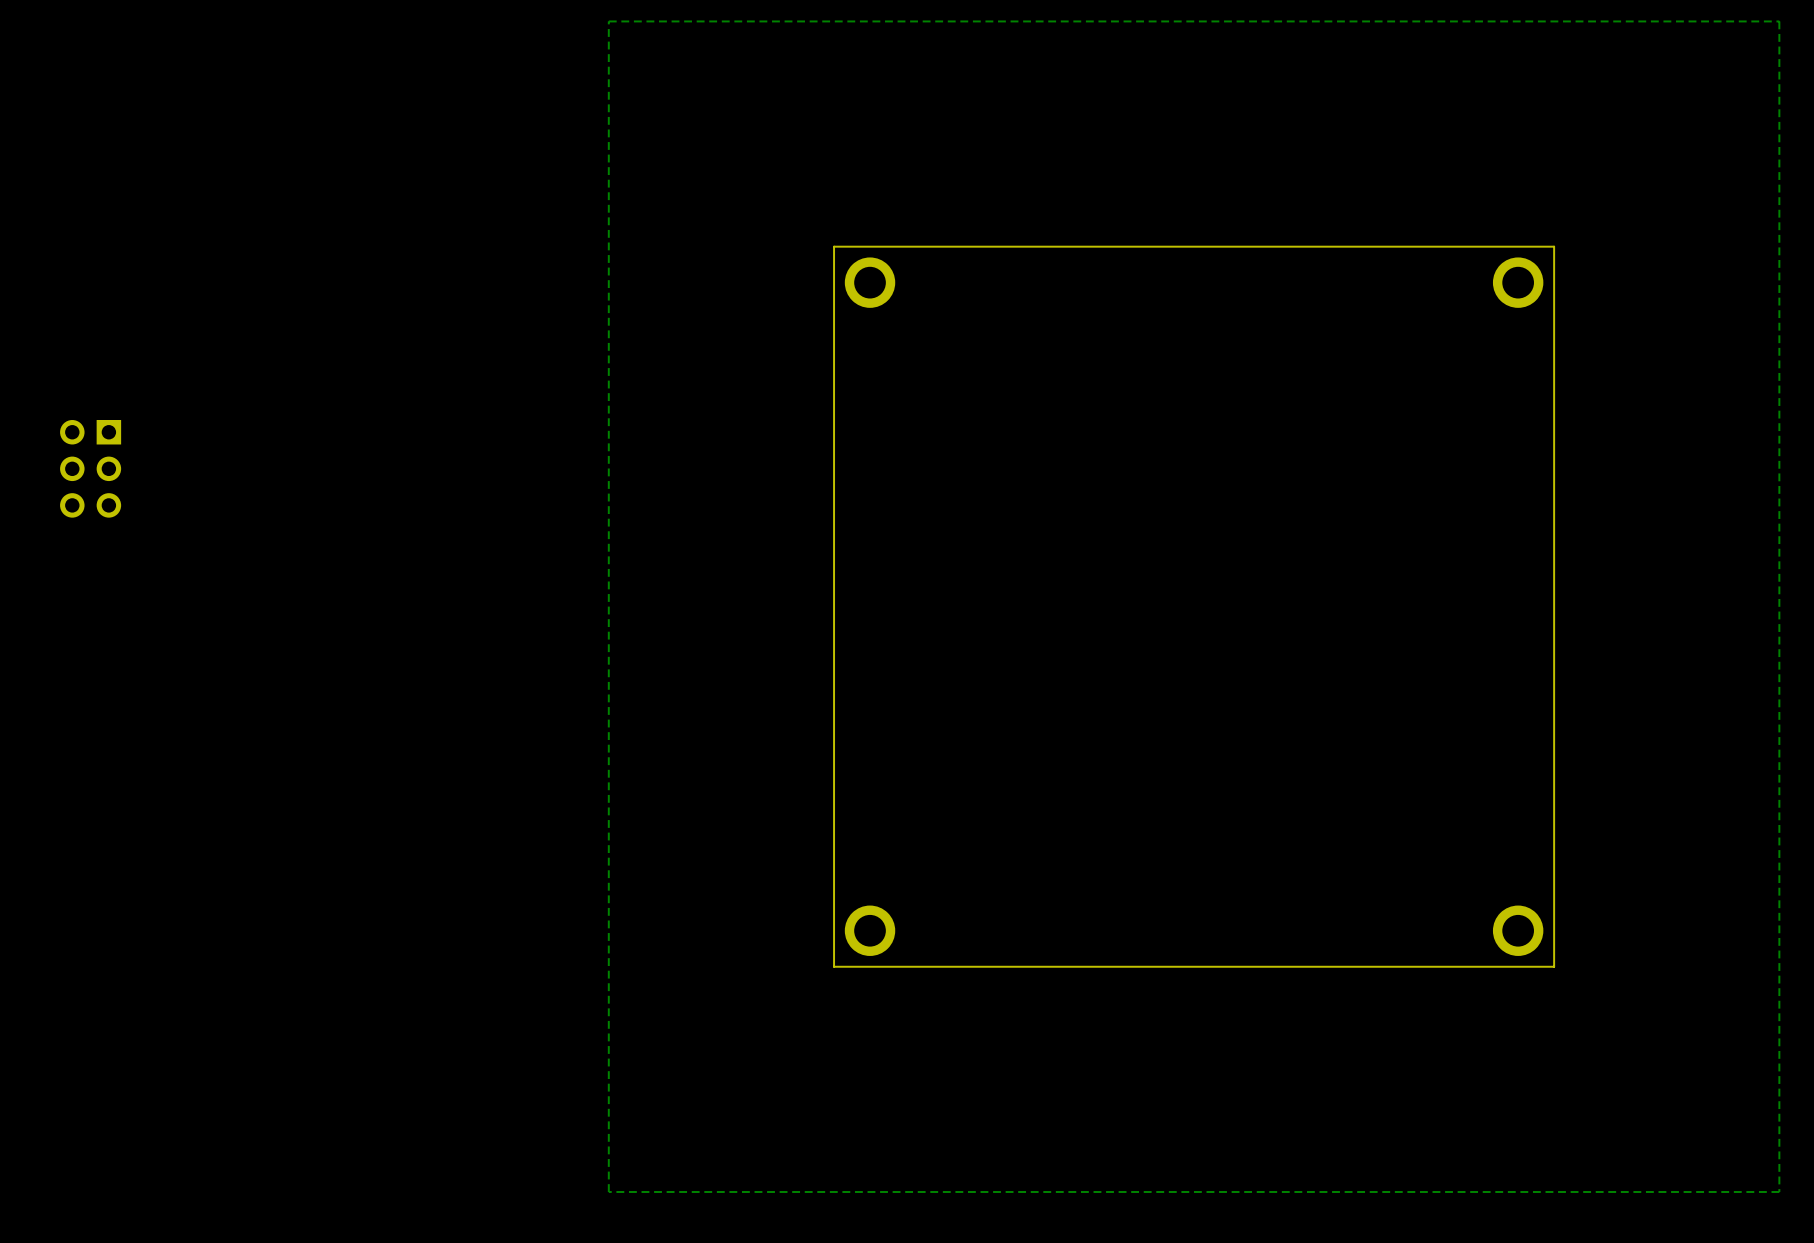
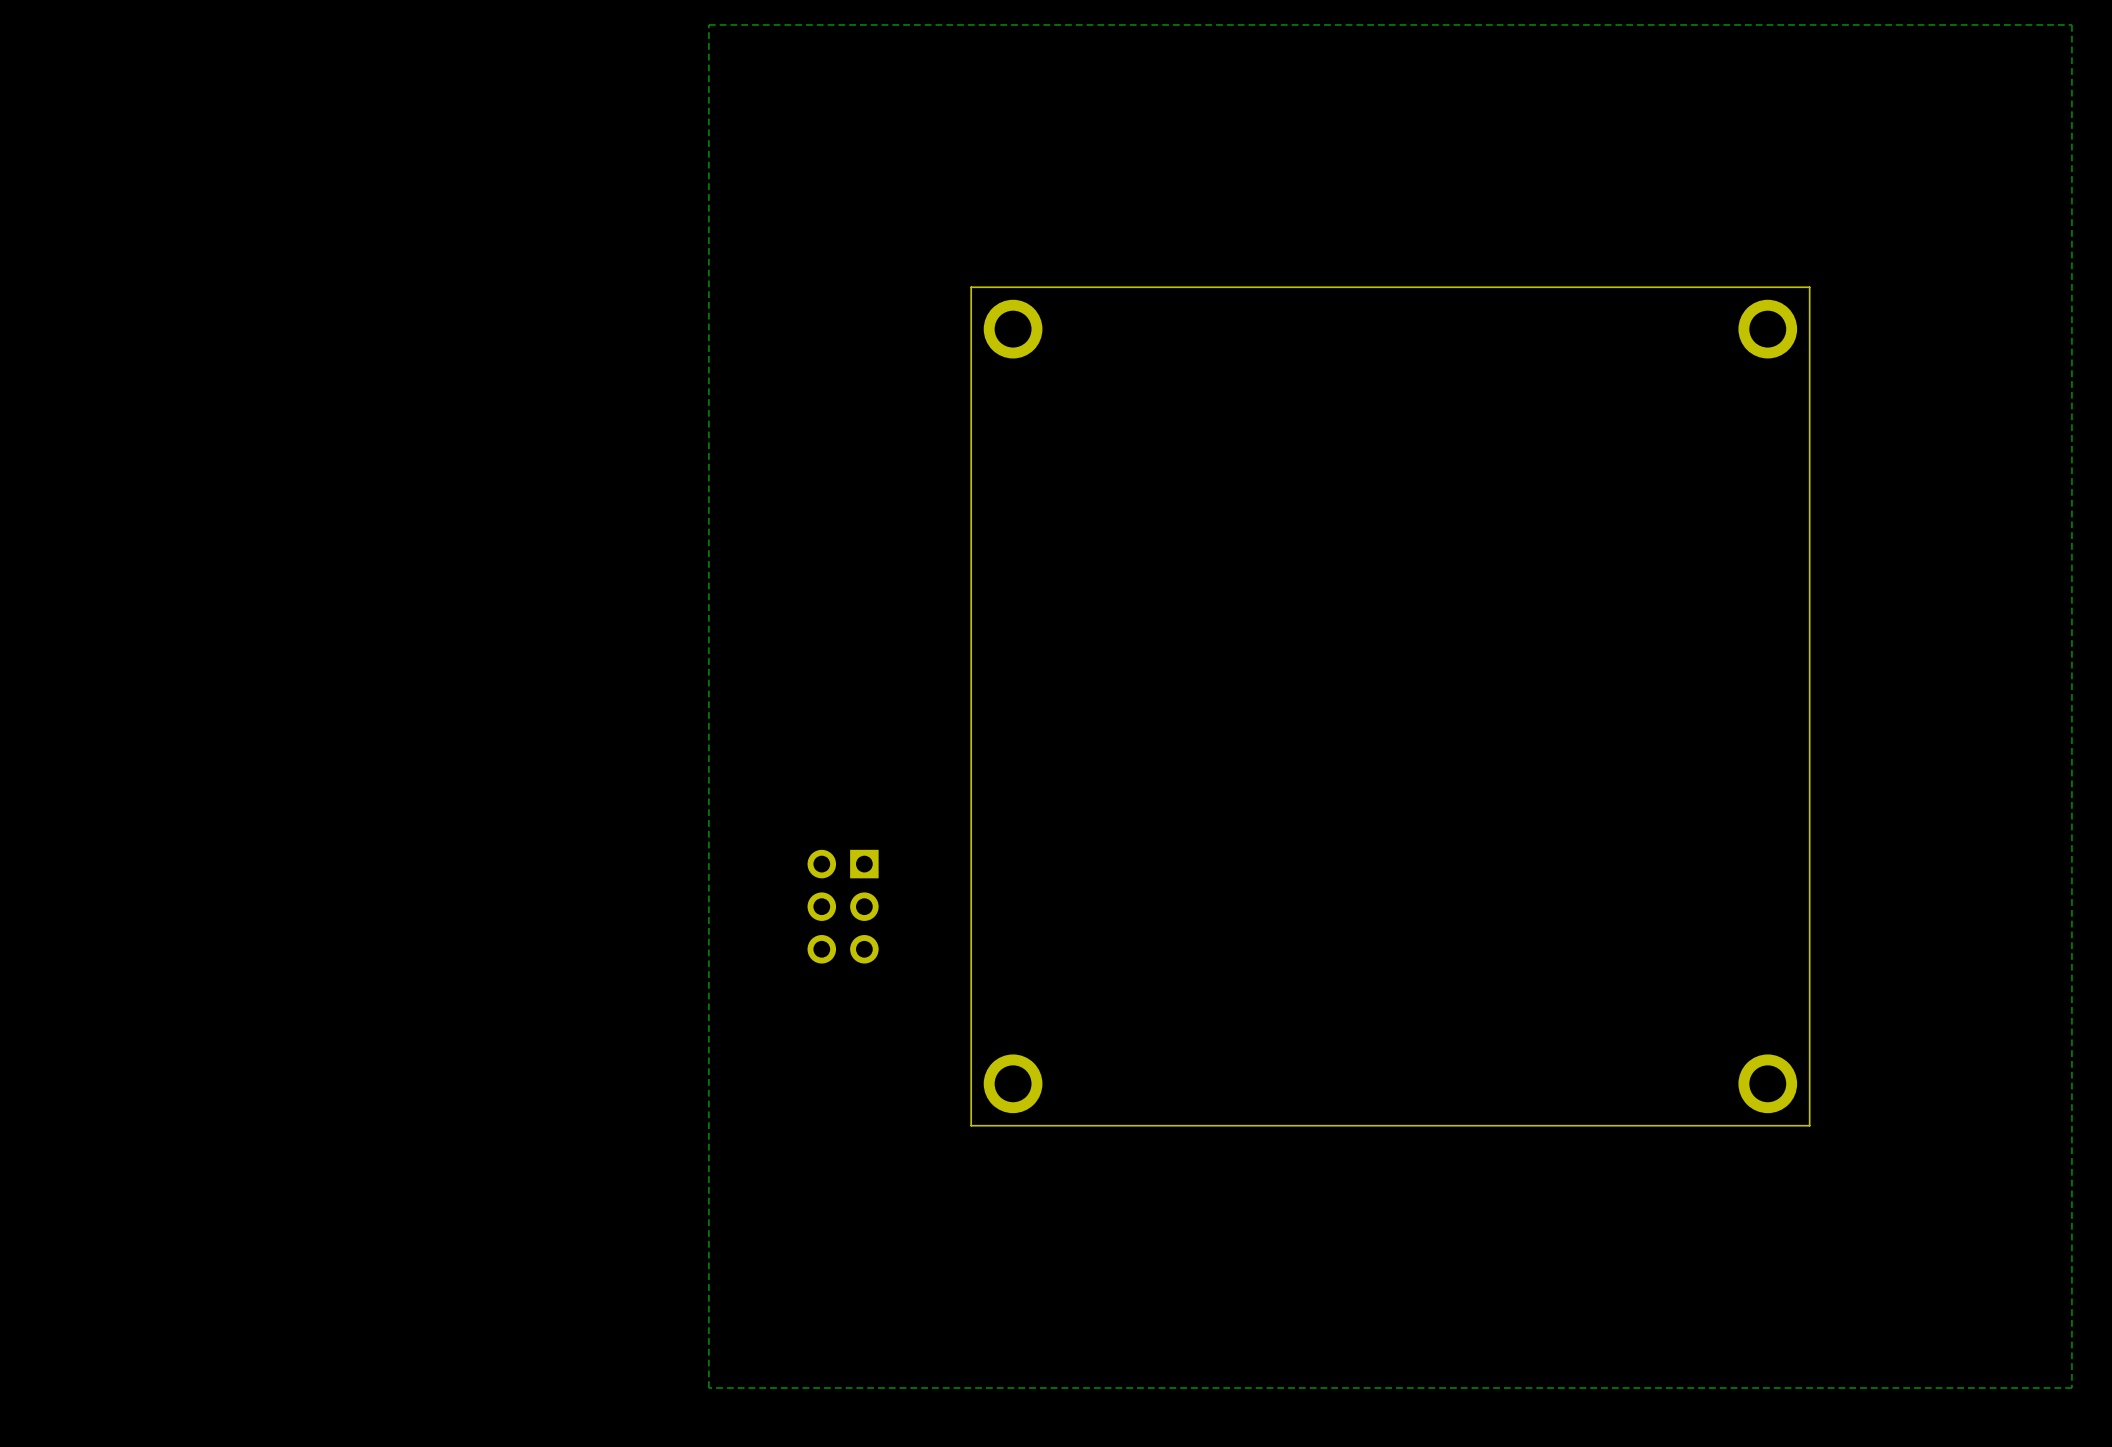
part: (90, 468) -> none
part: none -> (843, 906)

